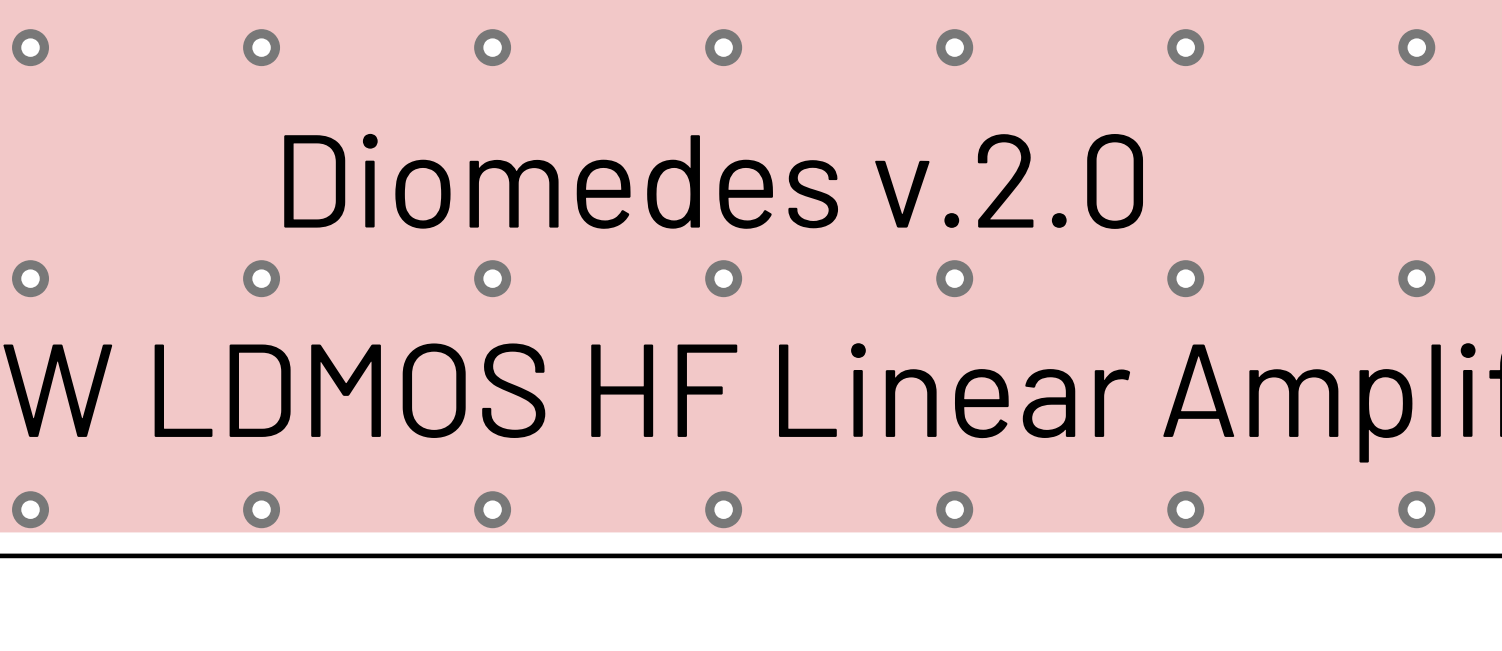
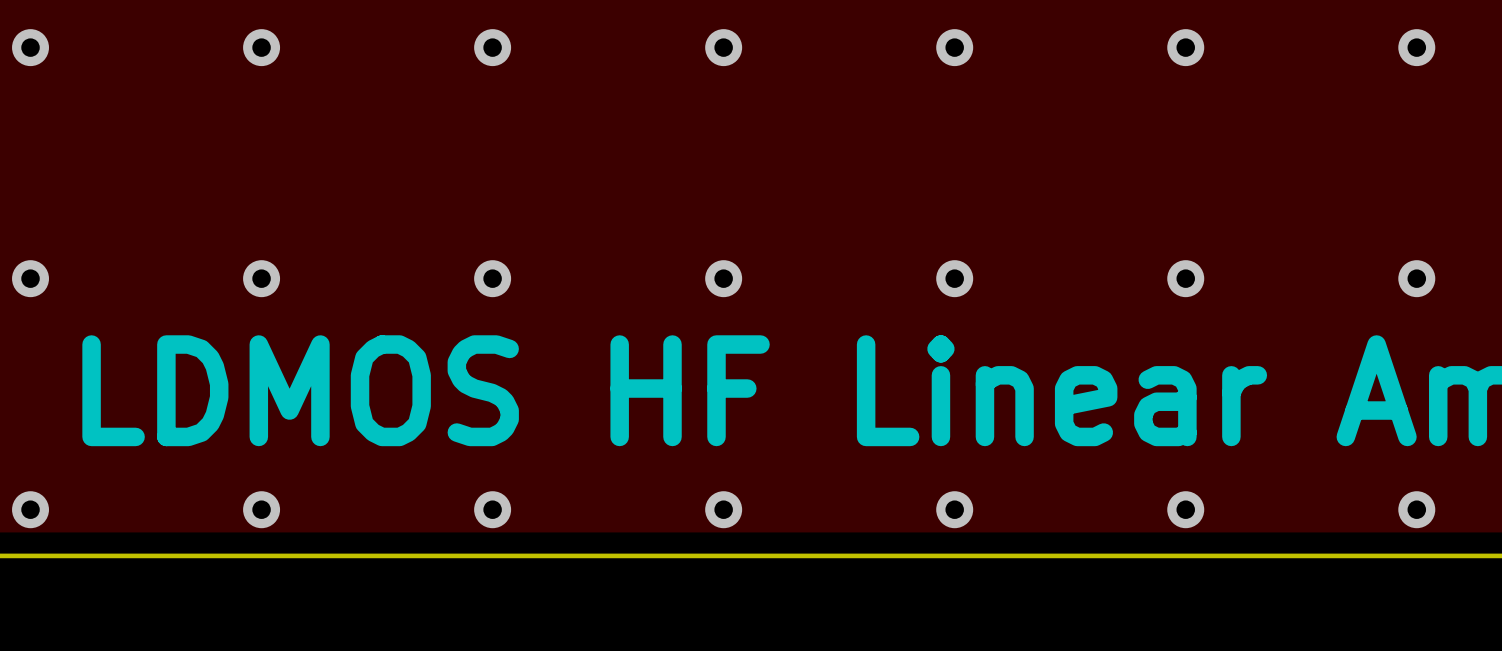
text: Diomedes v.2.0 (713, 181) -> none

